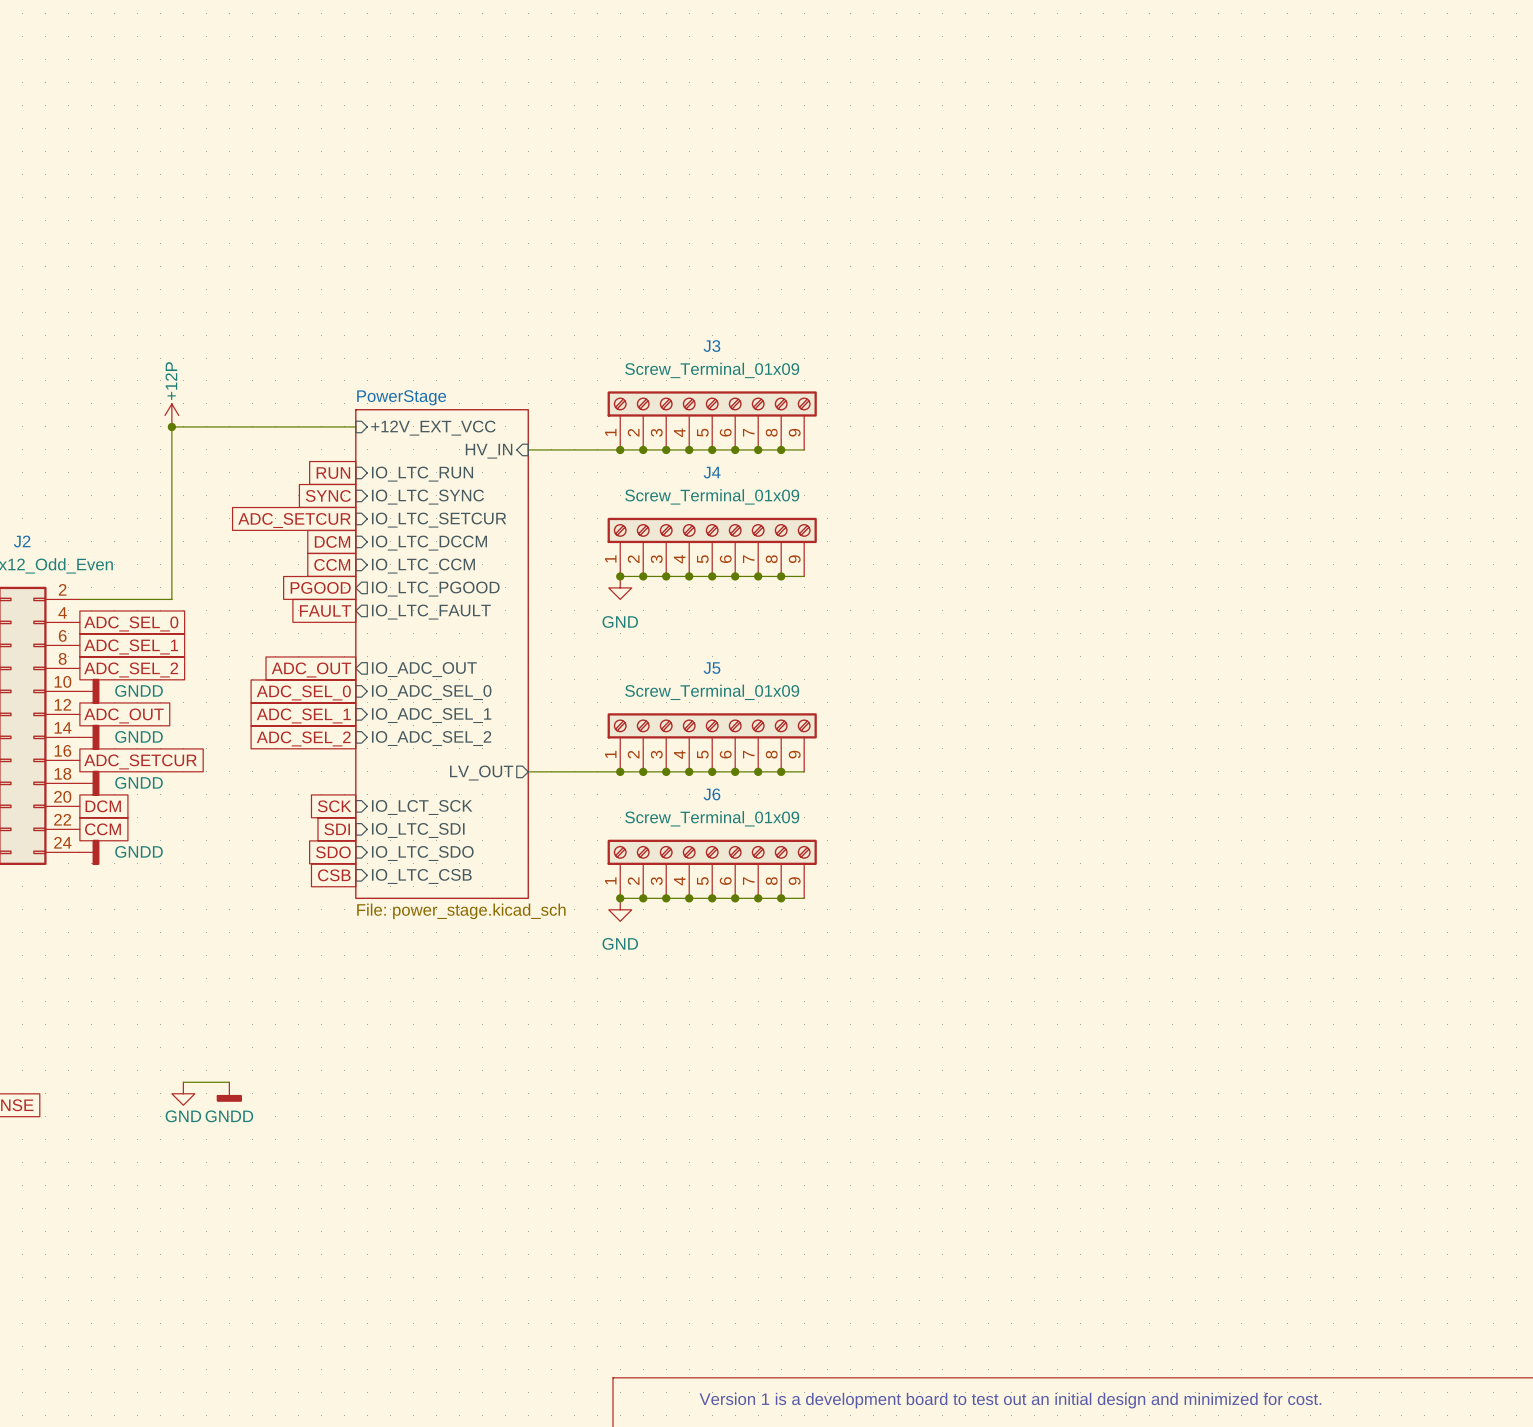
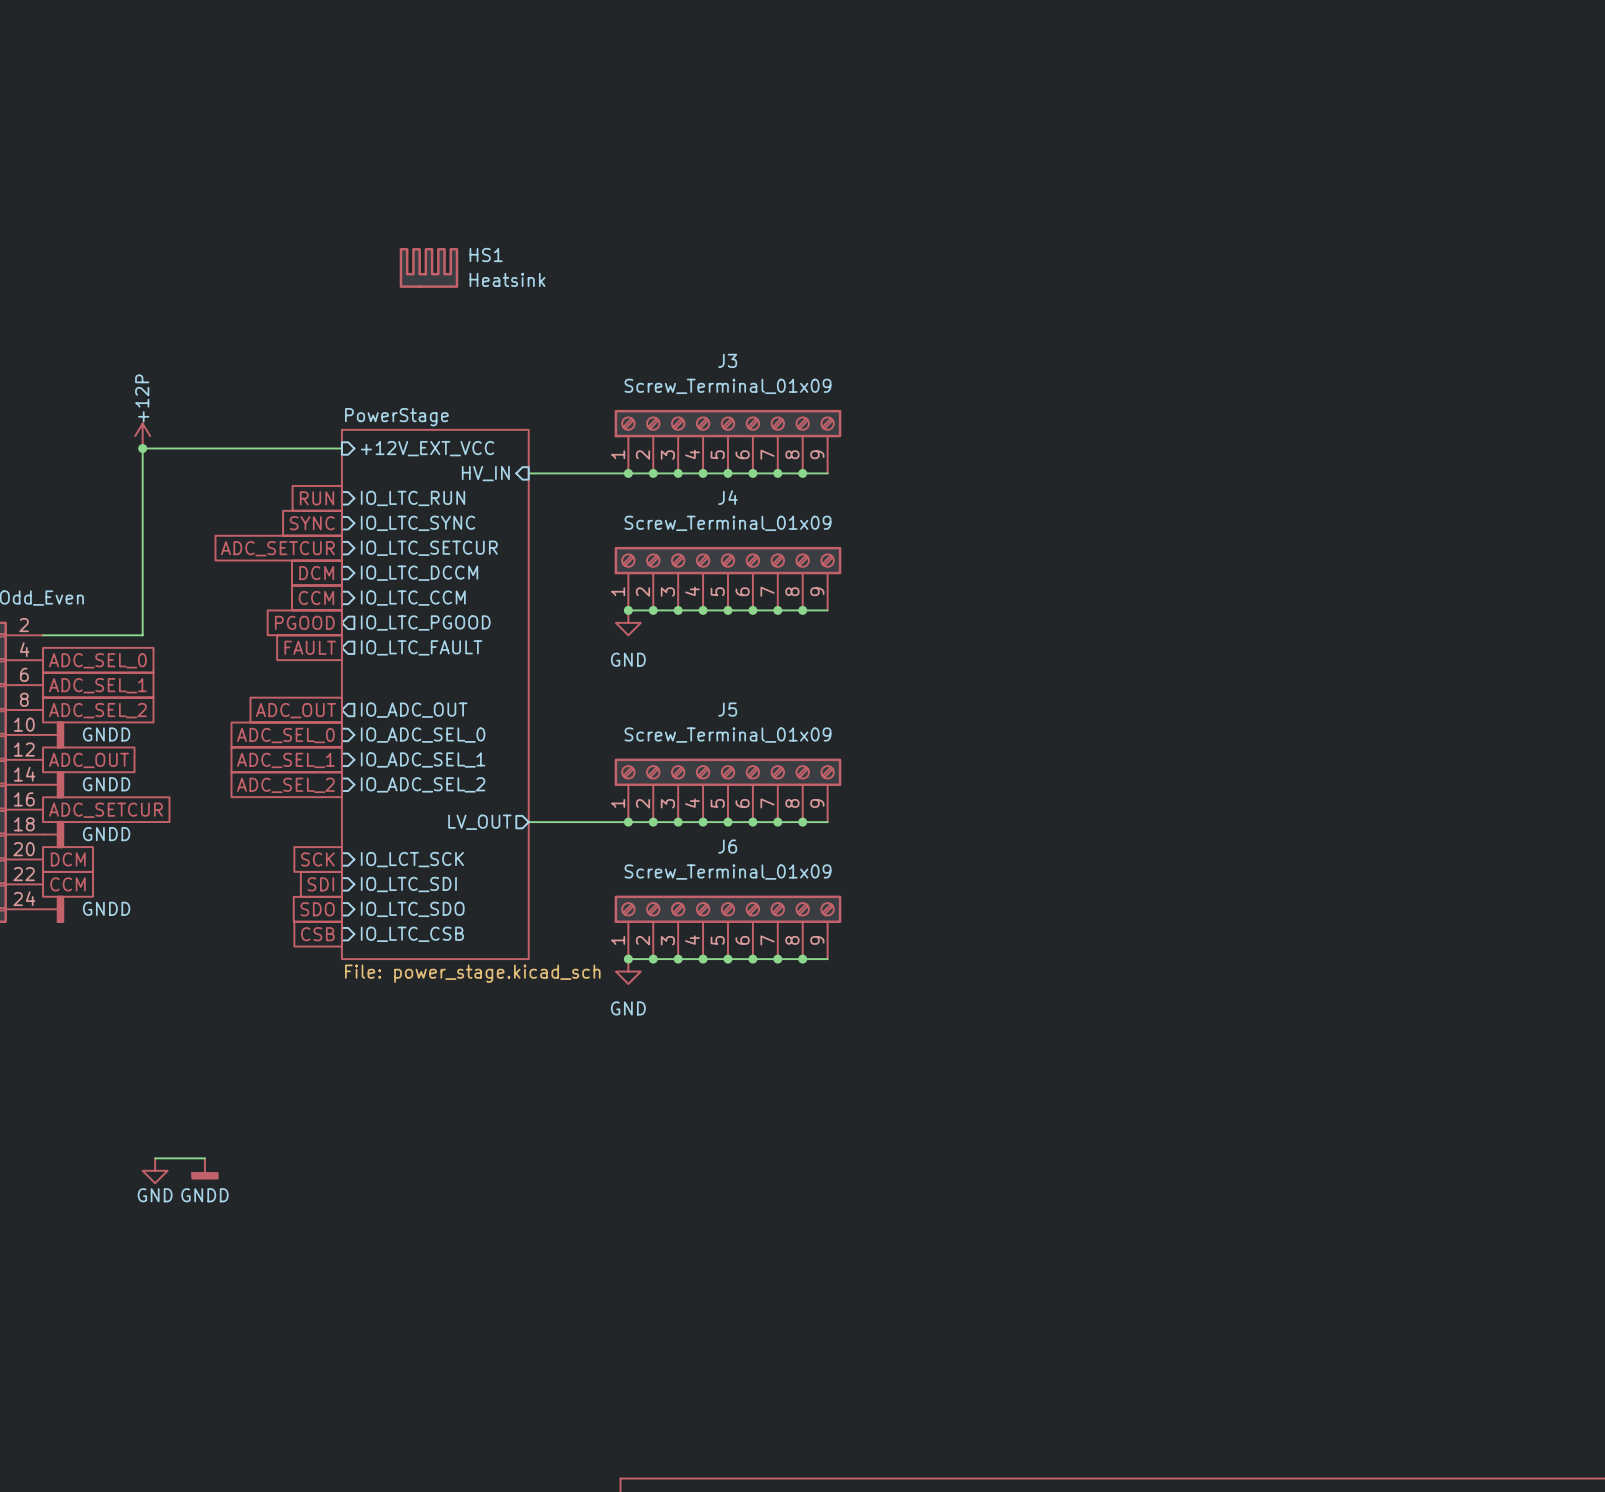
HS1: none -> Heatsink (428, 267)

